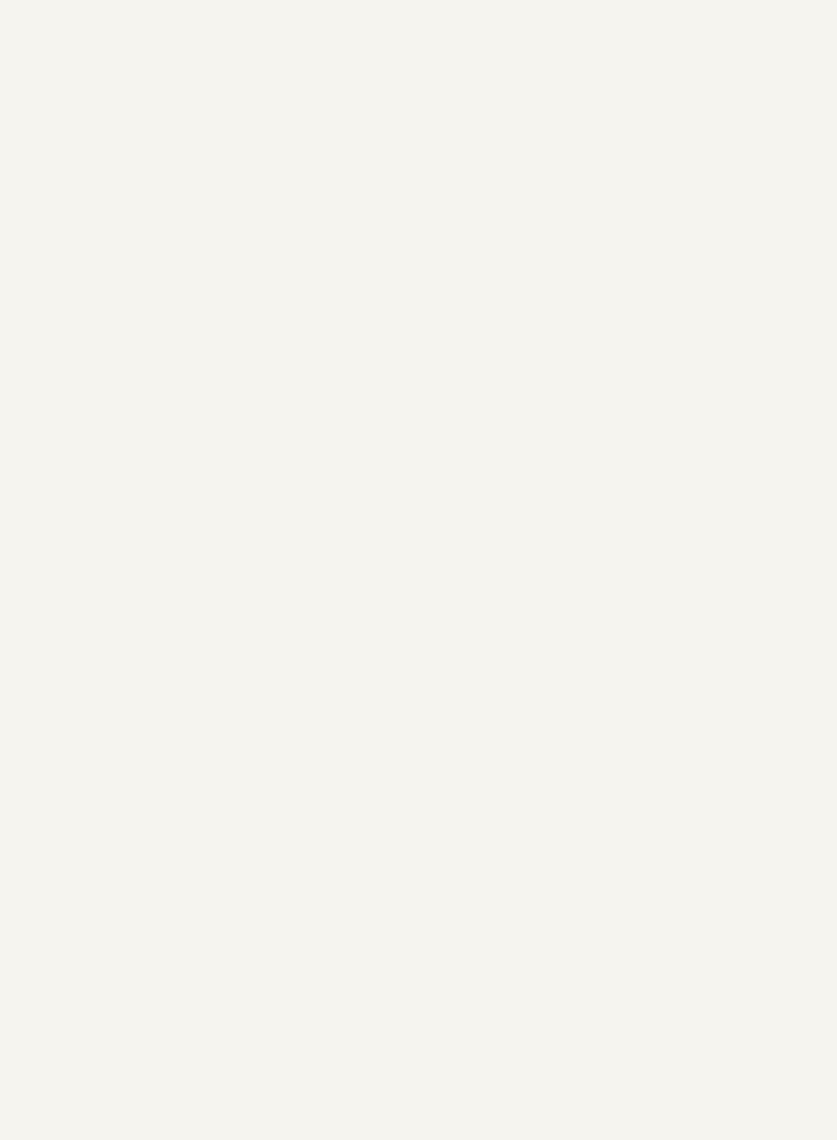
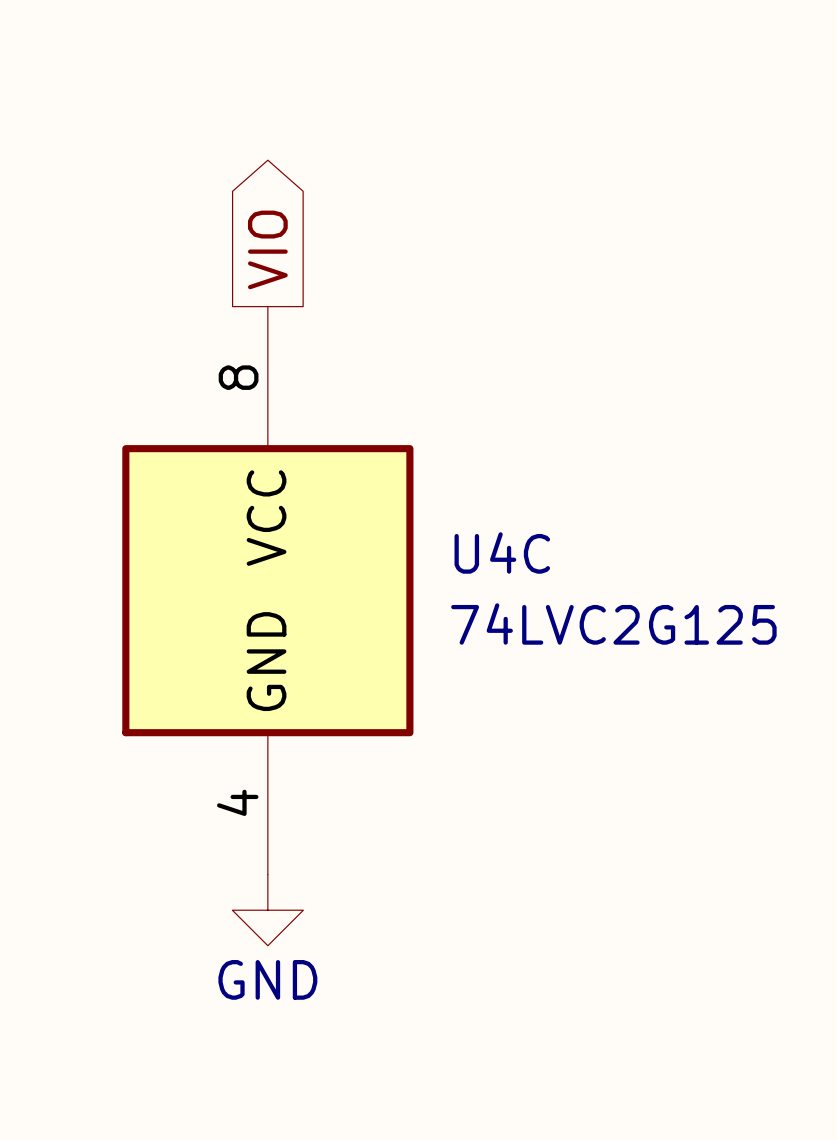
global label: none -> VIO (267, 249)
U4C: none -> 74LVC2G125 (267, 590)
power symbol: none -> GND (267, 910)

